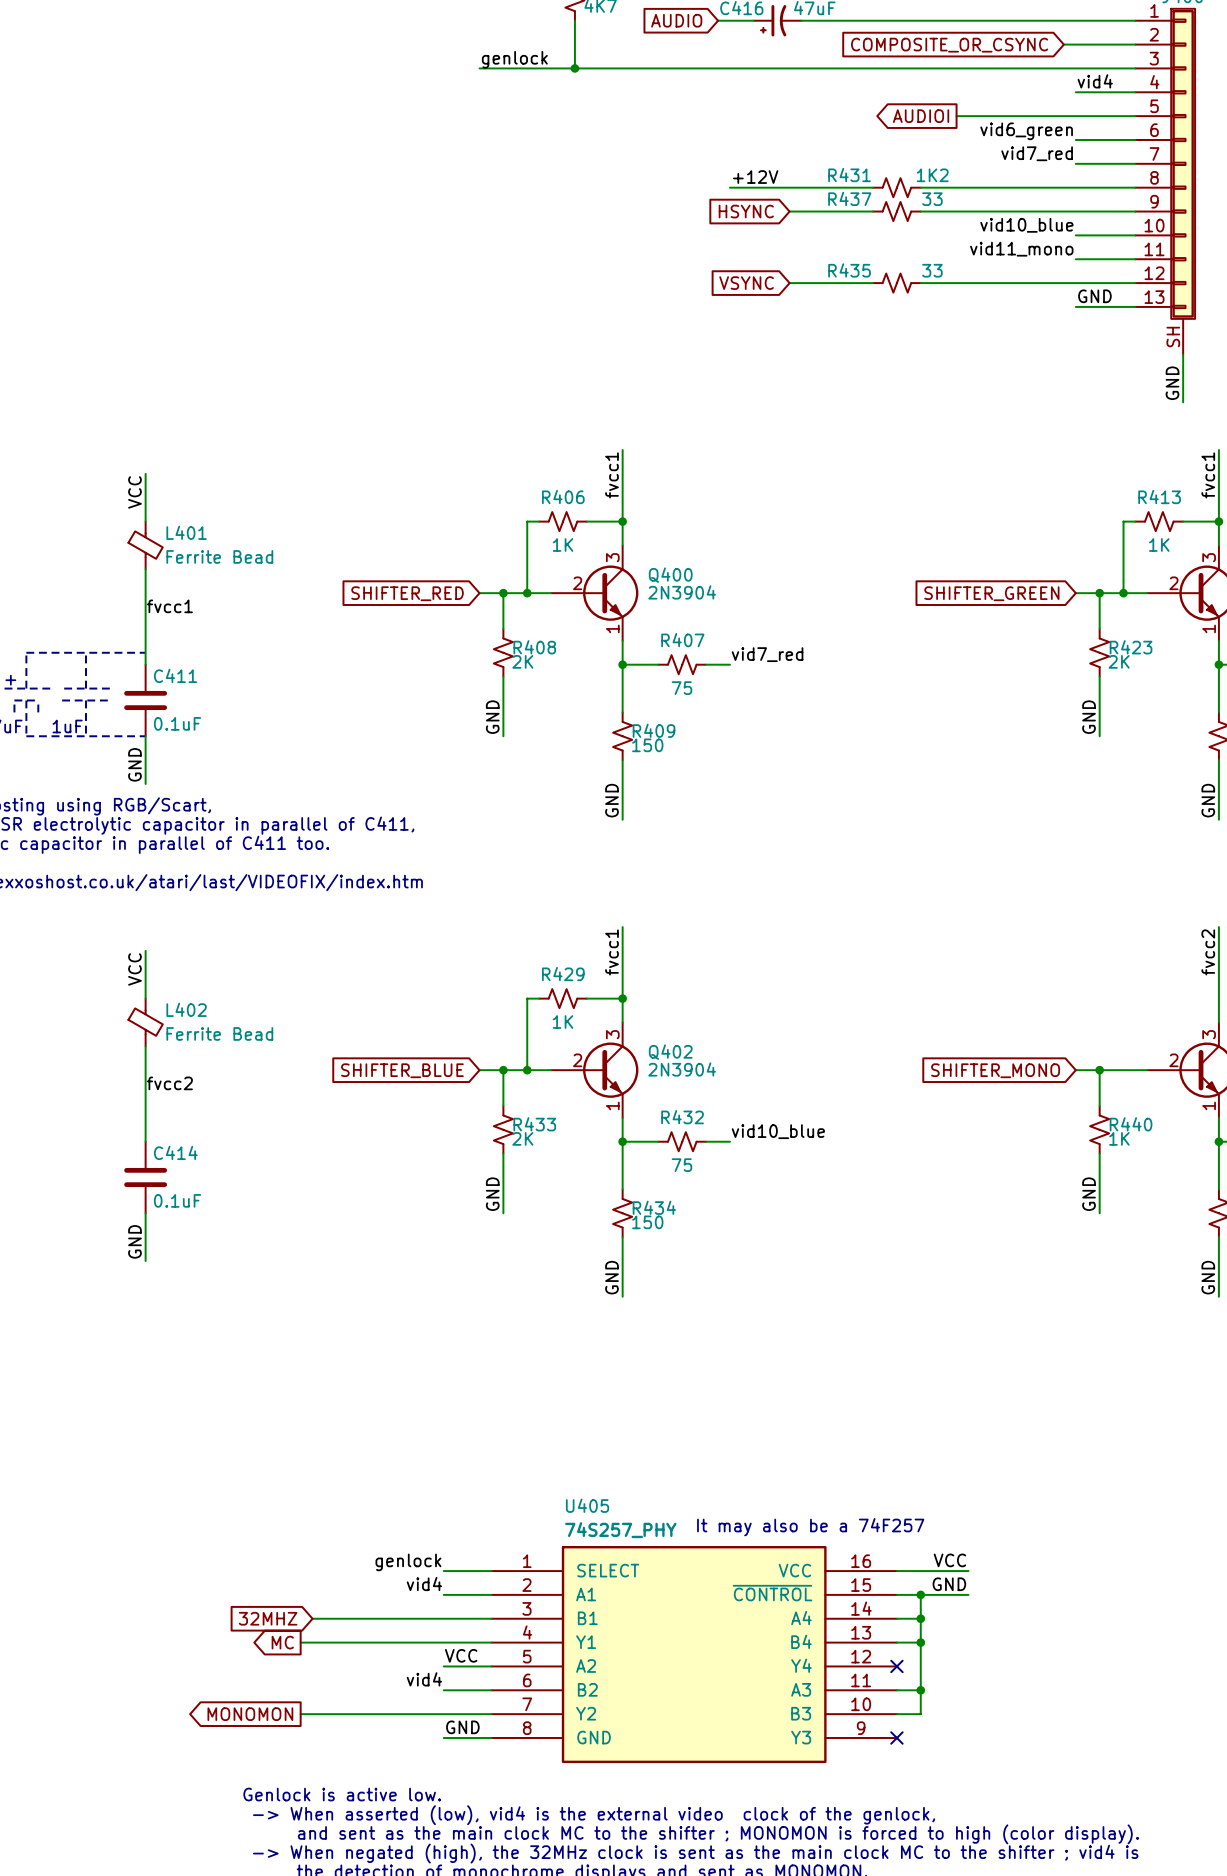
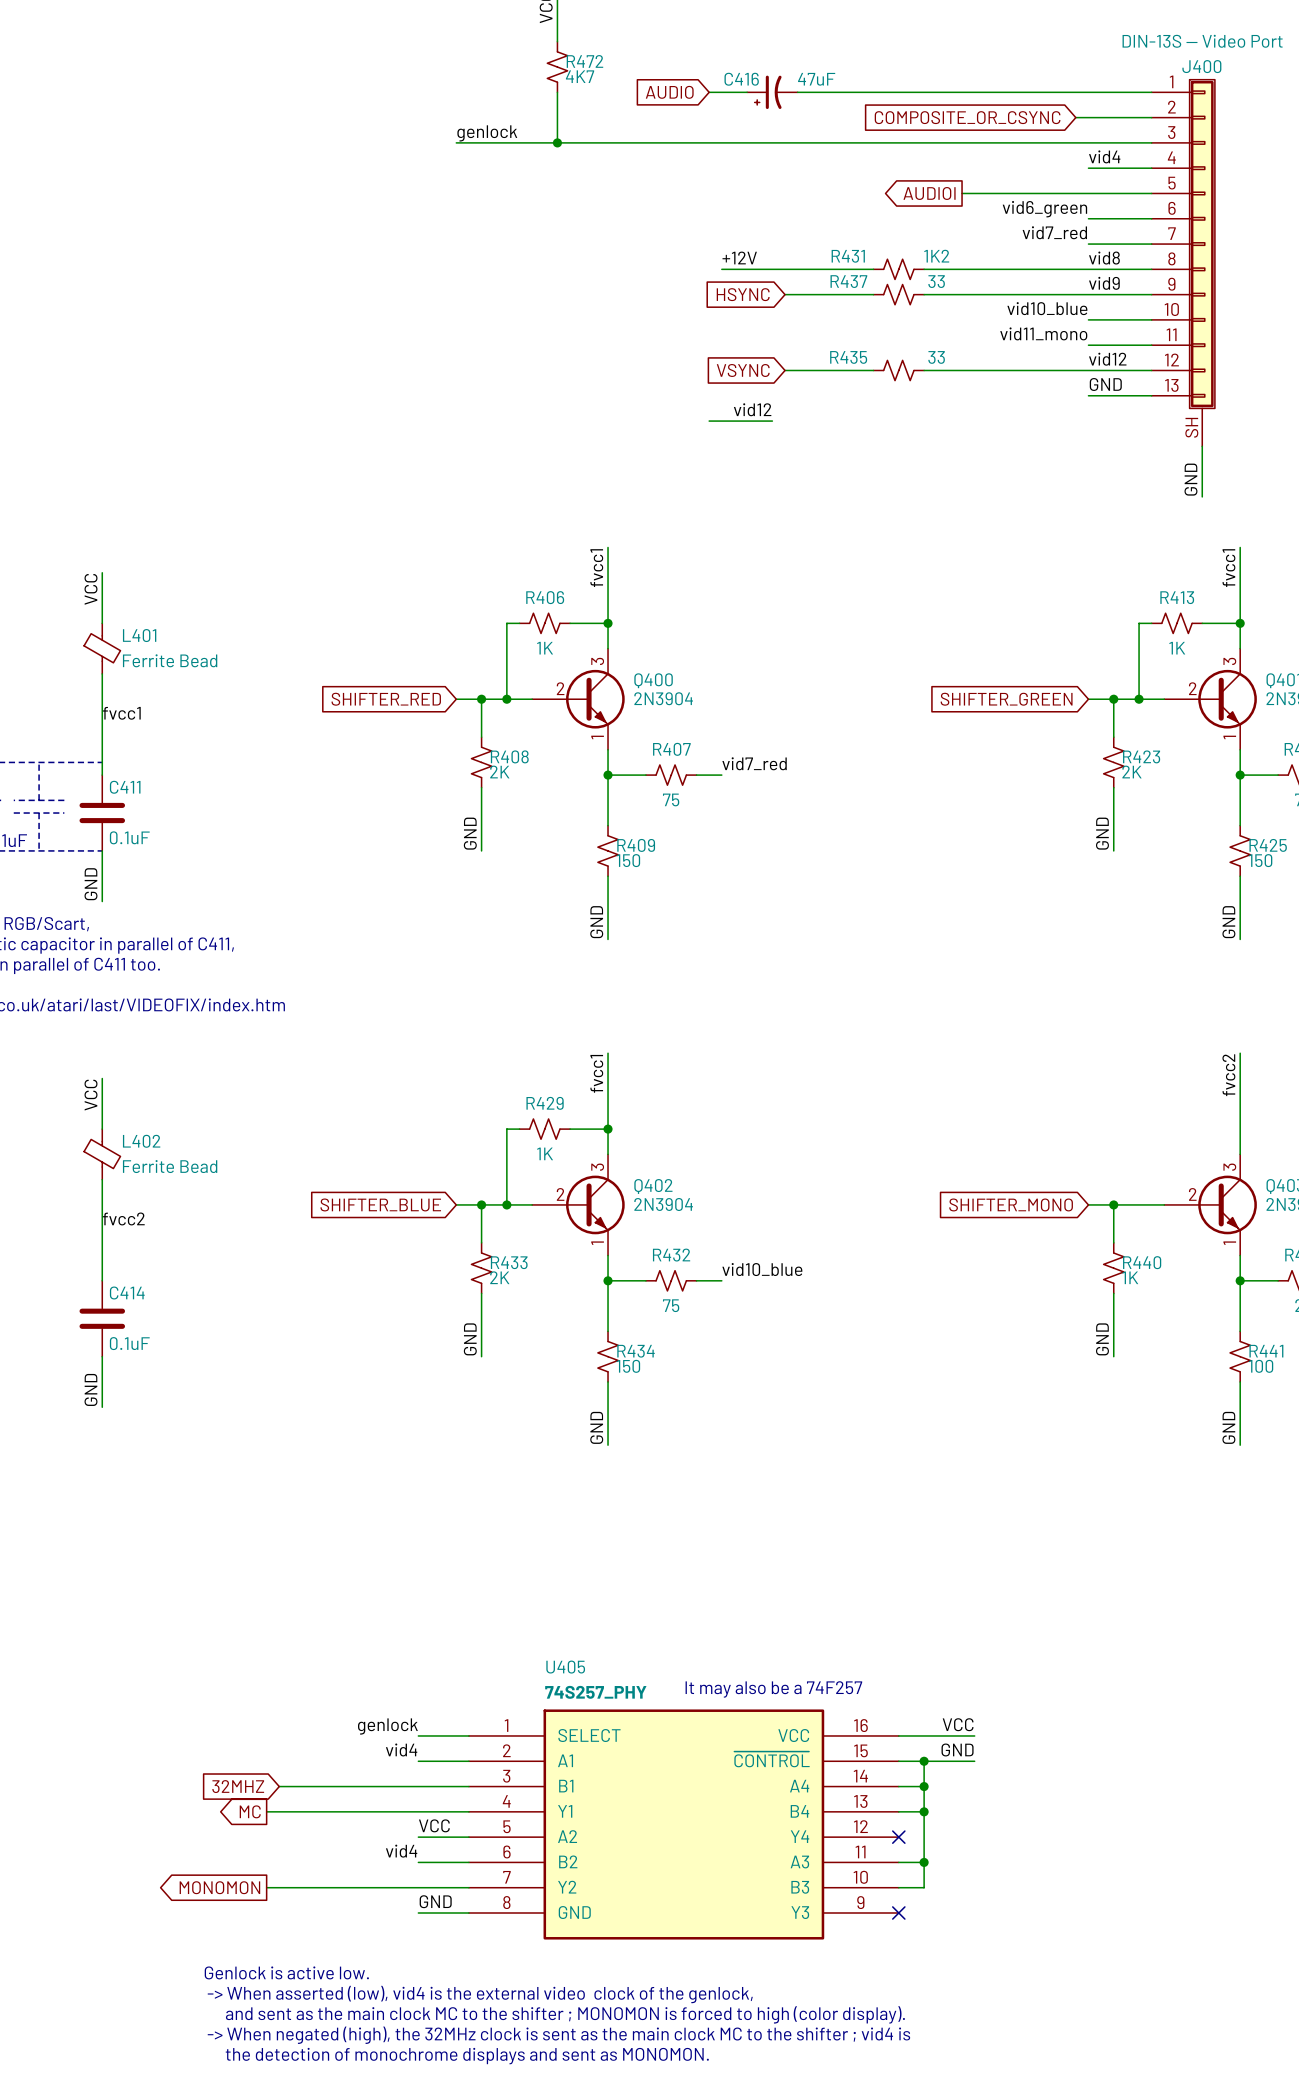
label: none -> vid8 (1104, 258)
label: none -> vid9 (1104, 283)
label: none -> vid12 (1107, 359)
label: none -> vid12 (752, 409)
wire: none -> (709, 421) (772, 421)

